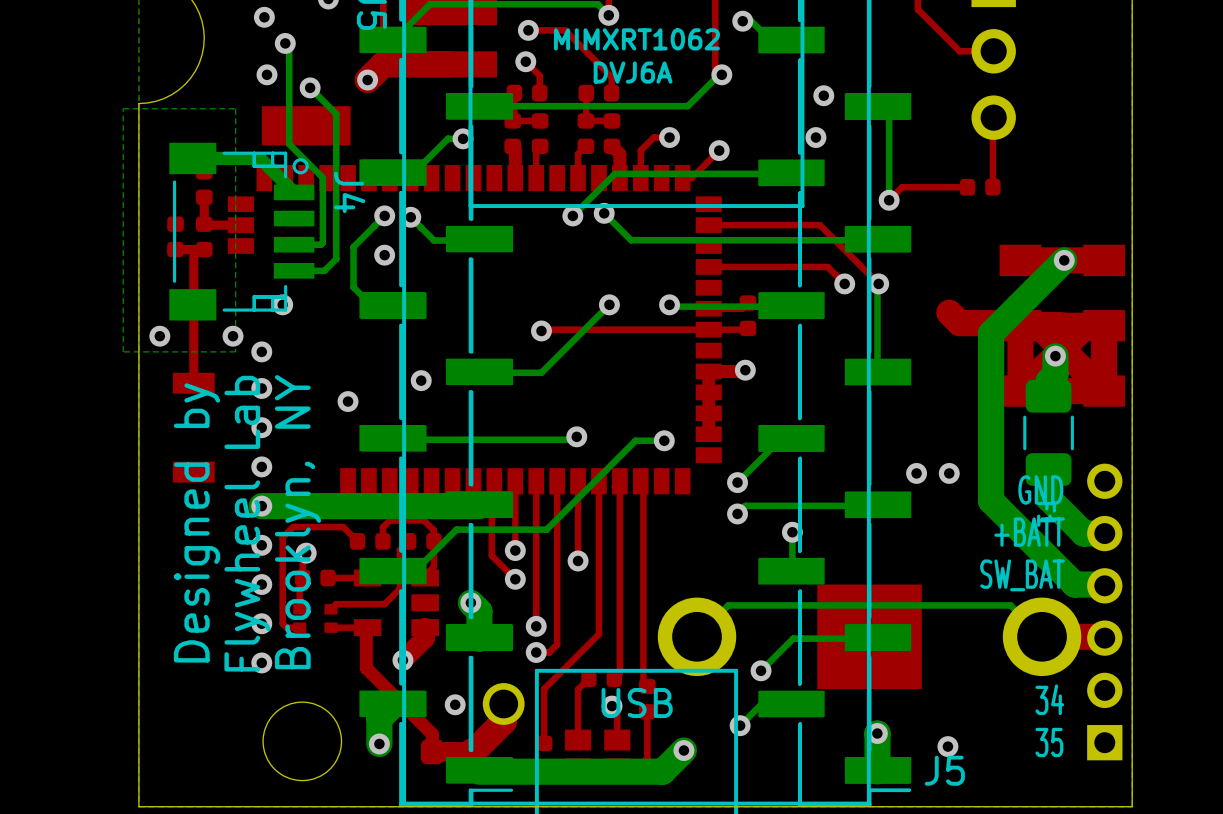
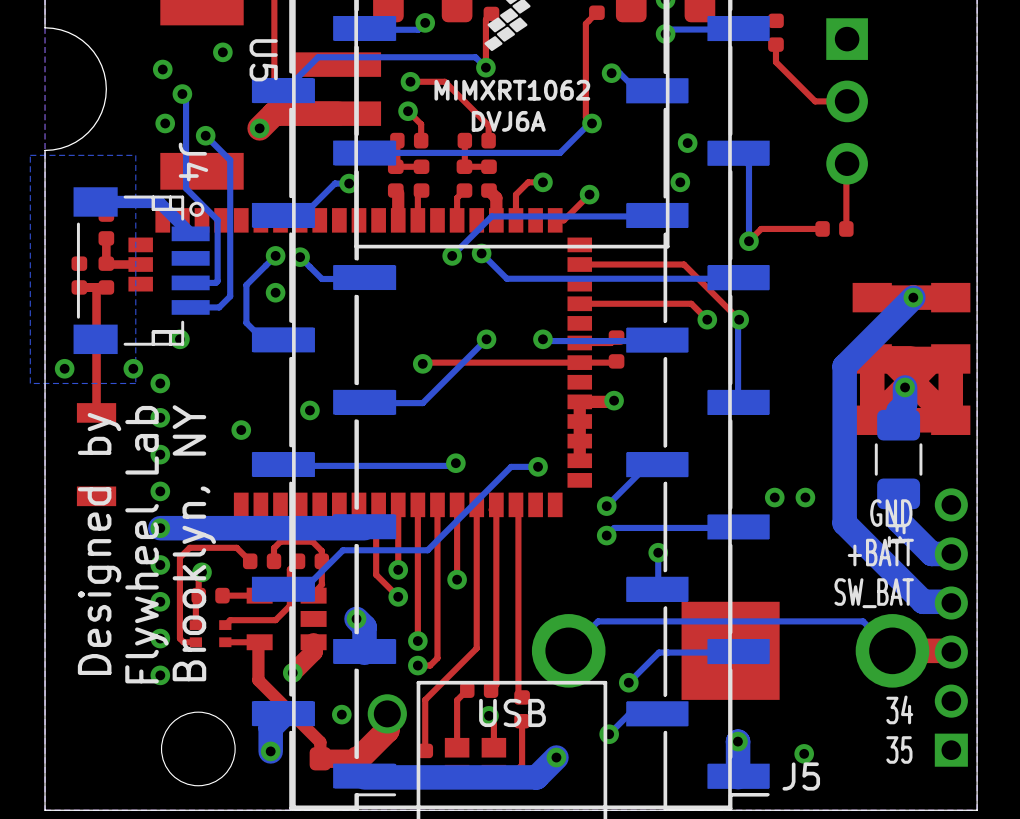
J4 name position: J4 (349, 192) -> J4 (193, 161)
top track: (949, 312) (959, 323) (1017, 323) -> none

